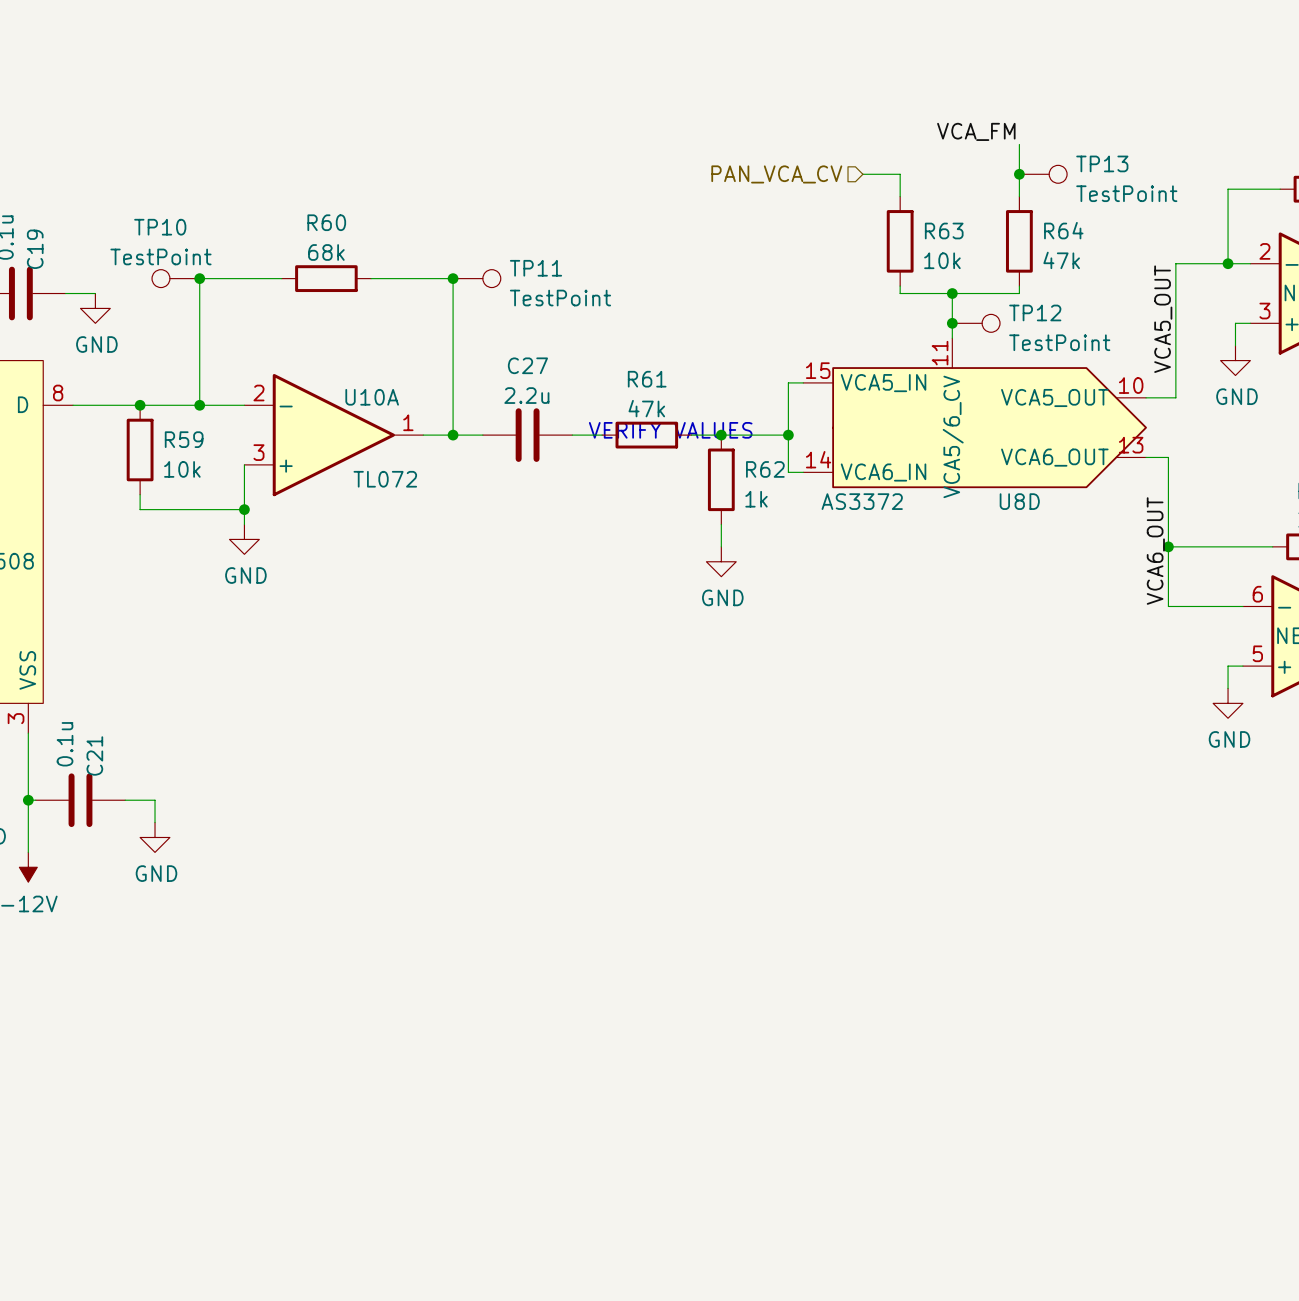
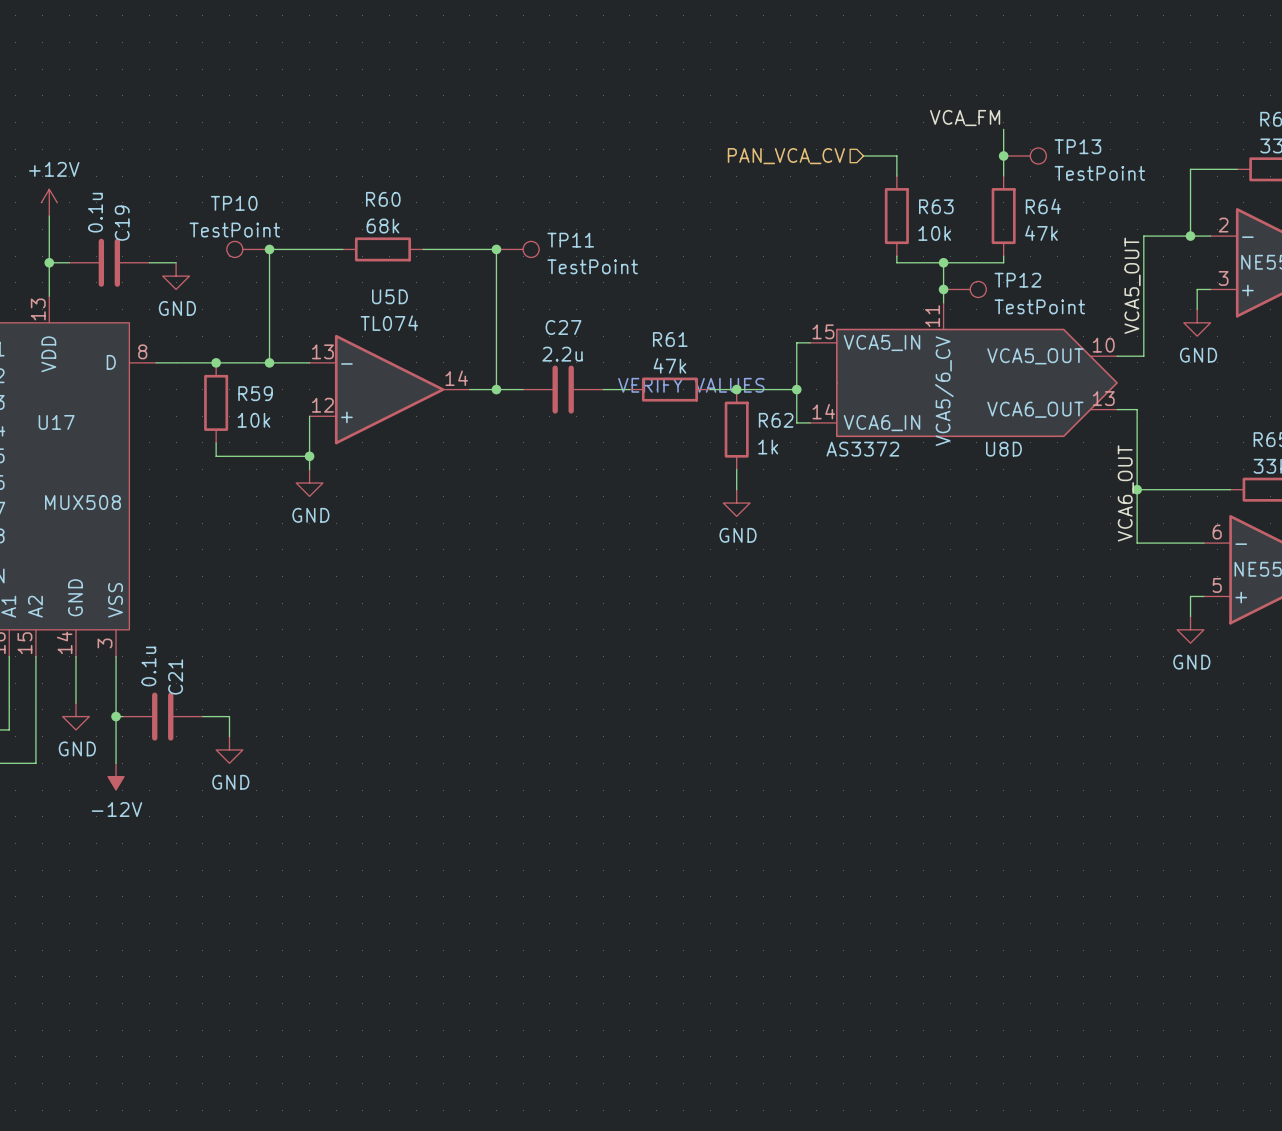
U10A pin number: 2 (258, 393) -> 13 (322, 351)
U10A name: U10A (372, 397) -> U5D (389, 296)
U10A pin number: 1 (408, 422) -> 14 (456, 378)
U10A pin number: 3 (258, 452) -> 12 (322, 405)
U10A value: TL072 (385, 479) -> TL074 (389, 323)

